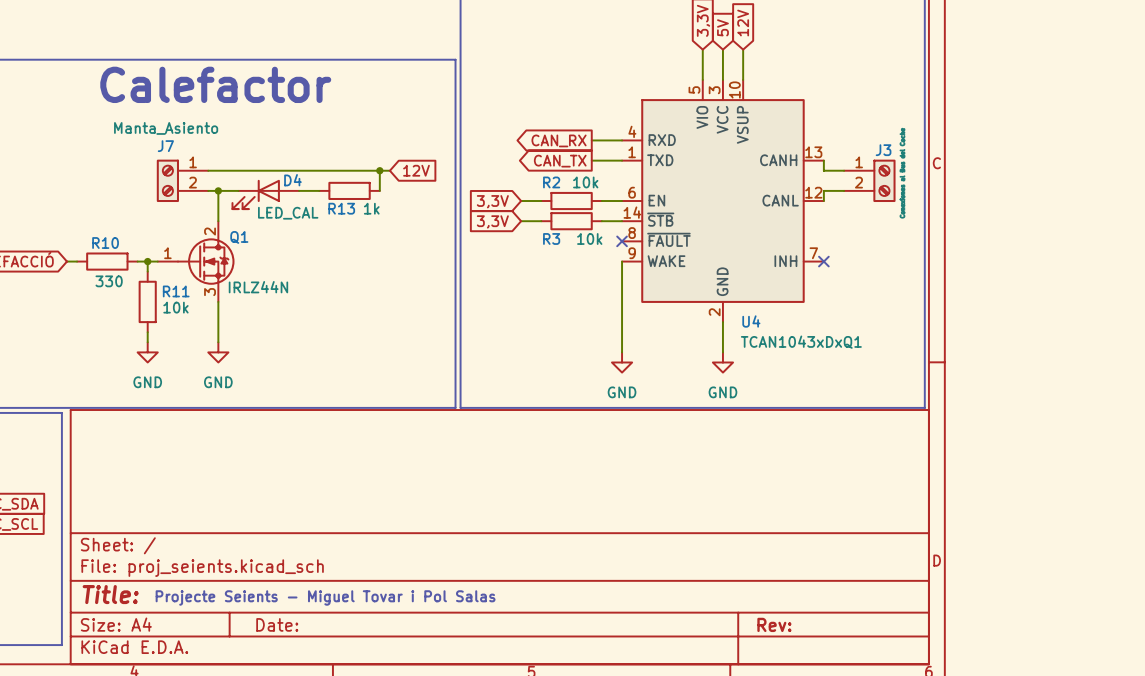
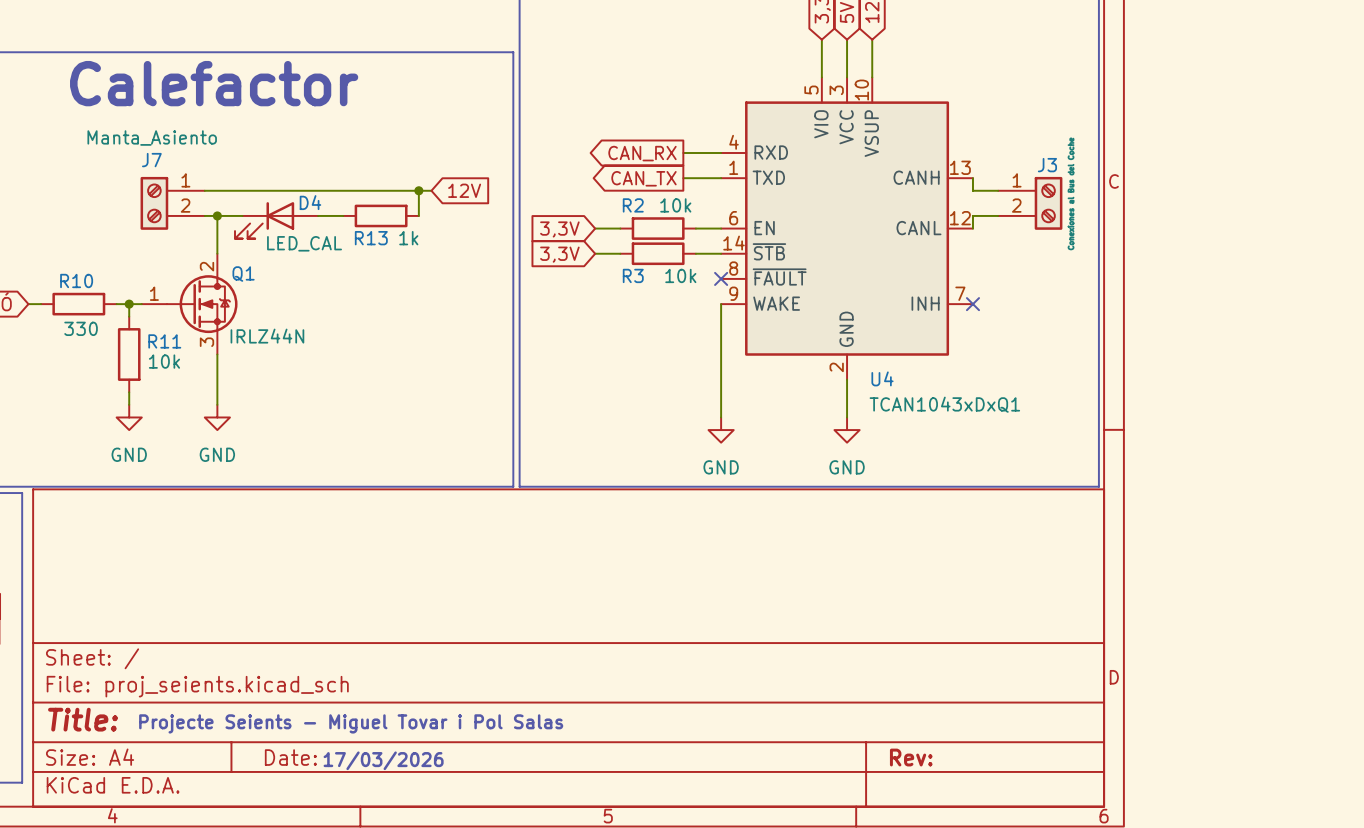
text: none -> 17/03/2026 (383, 760)

